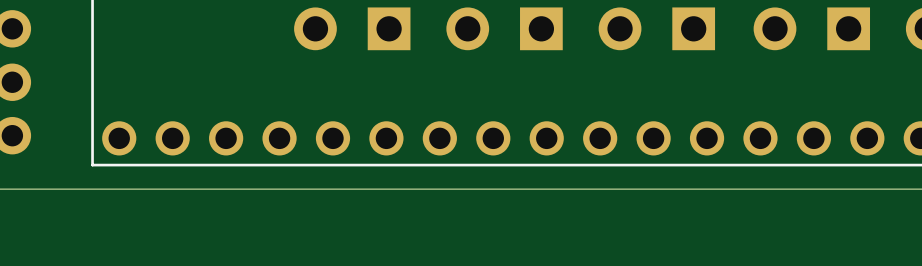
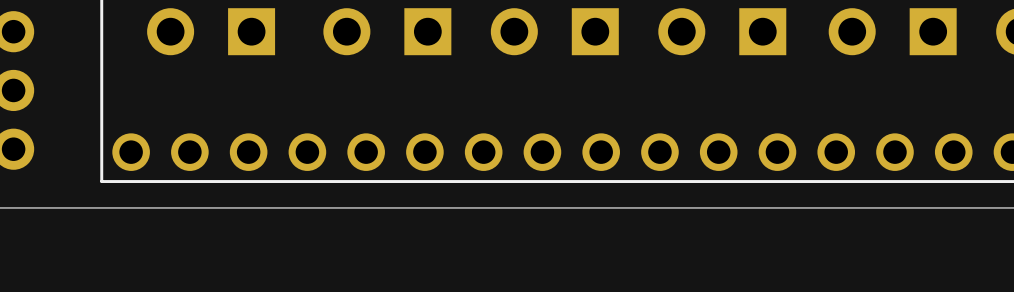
part: none -> (211, 31)

